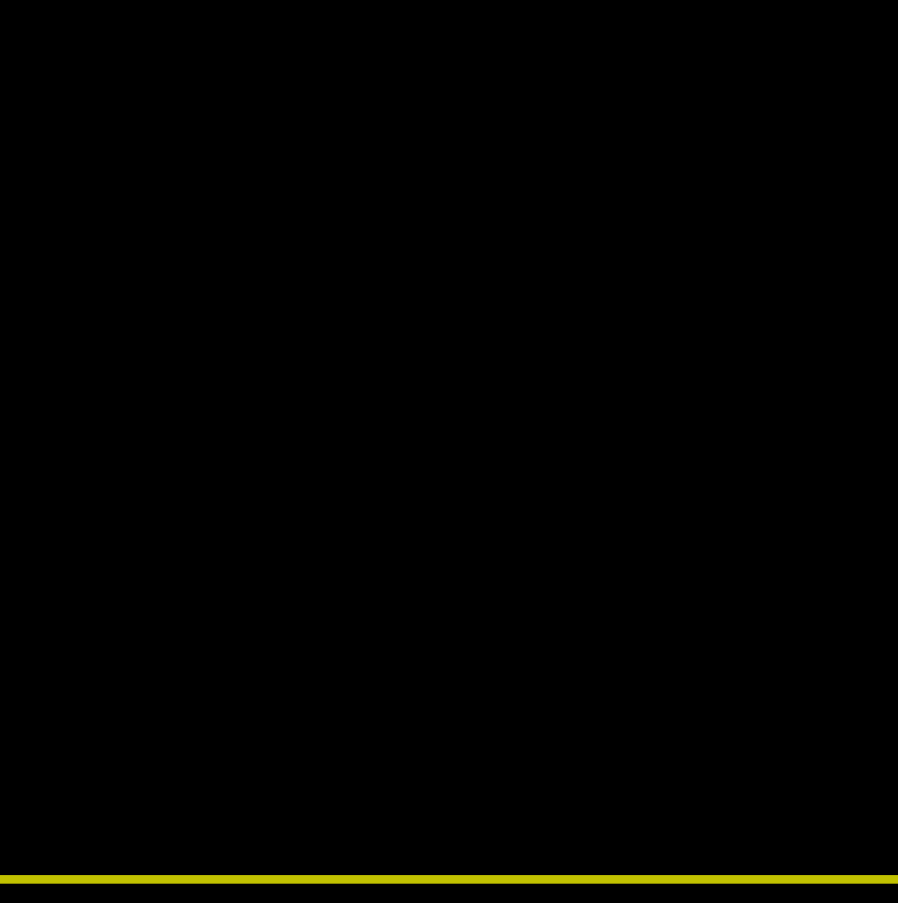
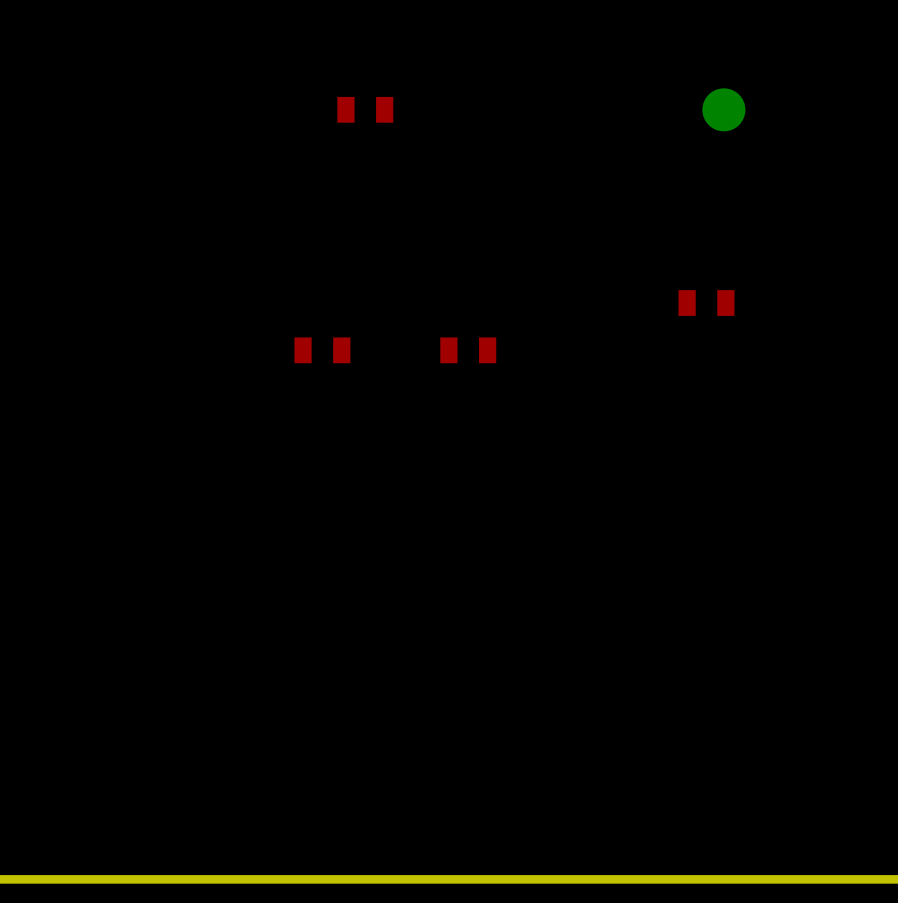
part: none -> (365, 109)
part: none -> (723, 109)
part: none -> (706, 303)
part: none -> (322, 350)
part: none -> (468, 350)

